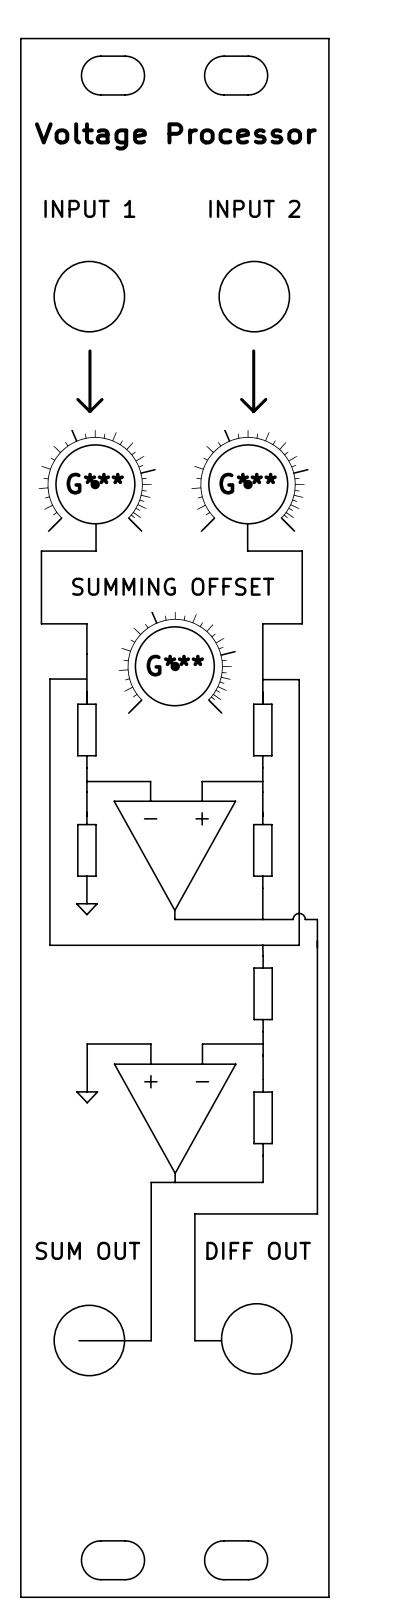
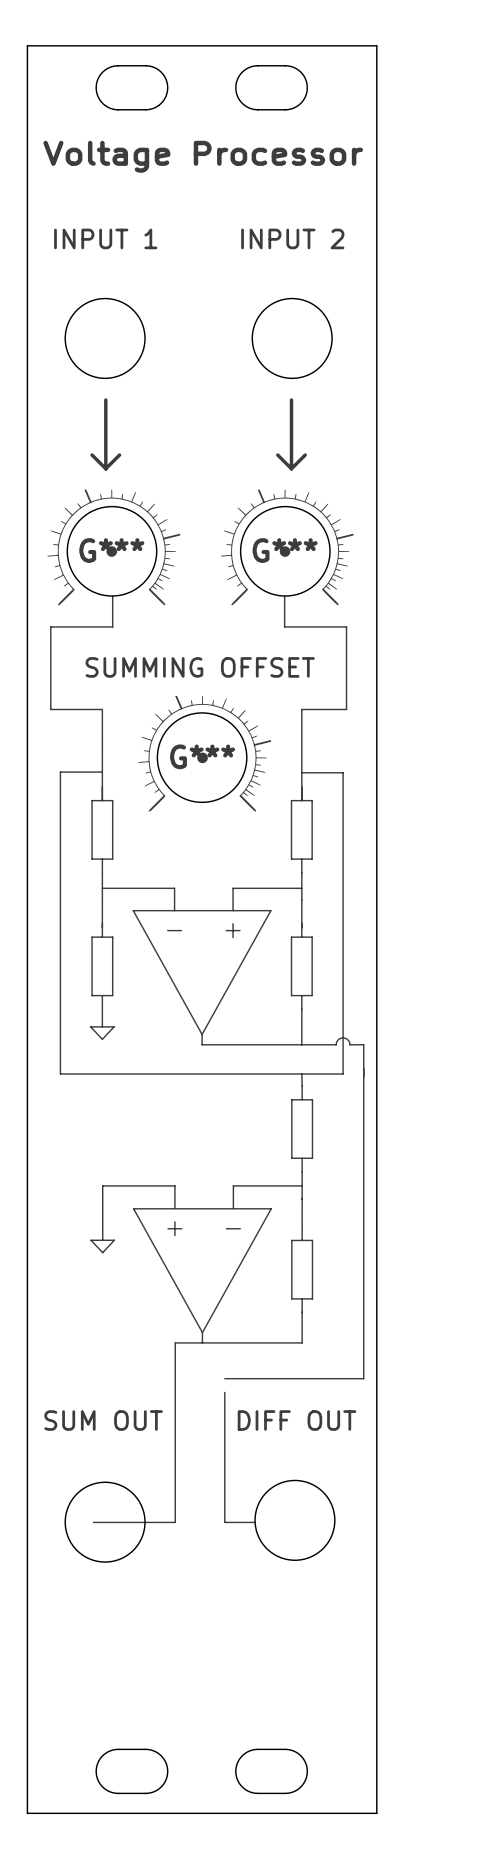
line: (194, 1213) (194, 1226) -> none

